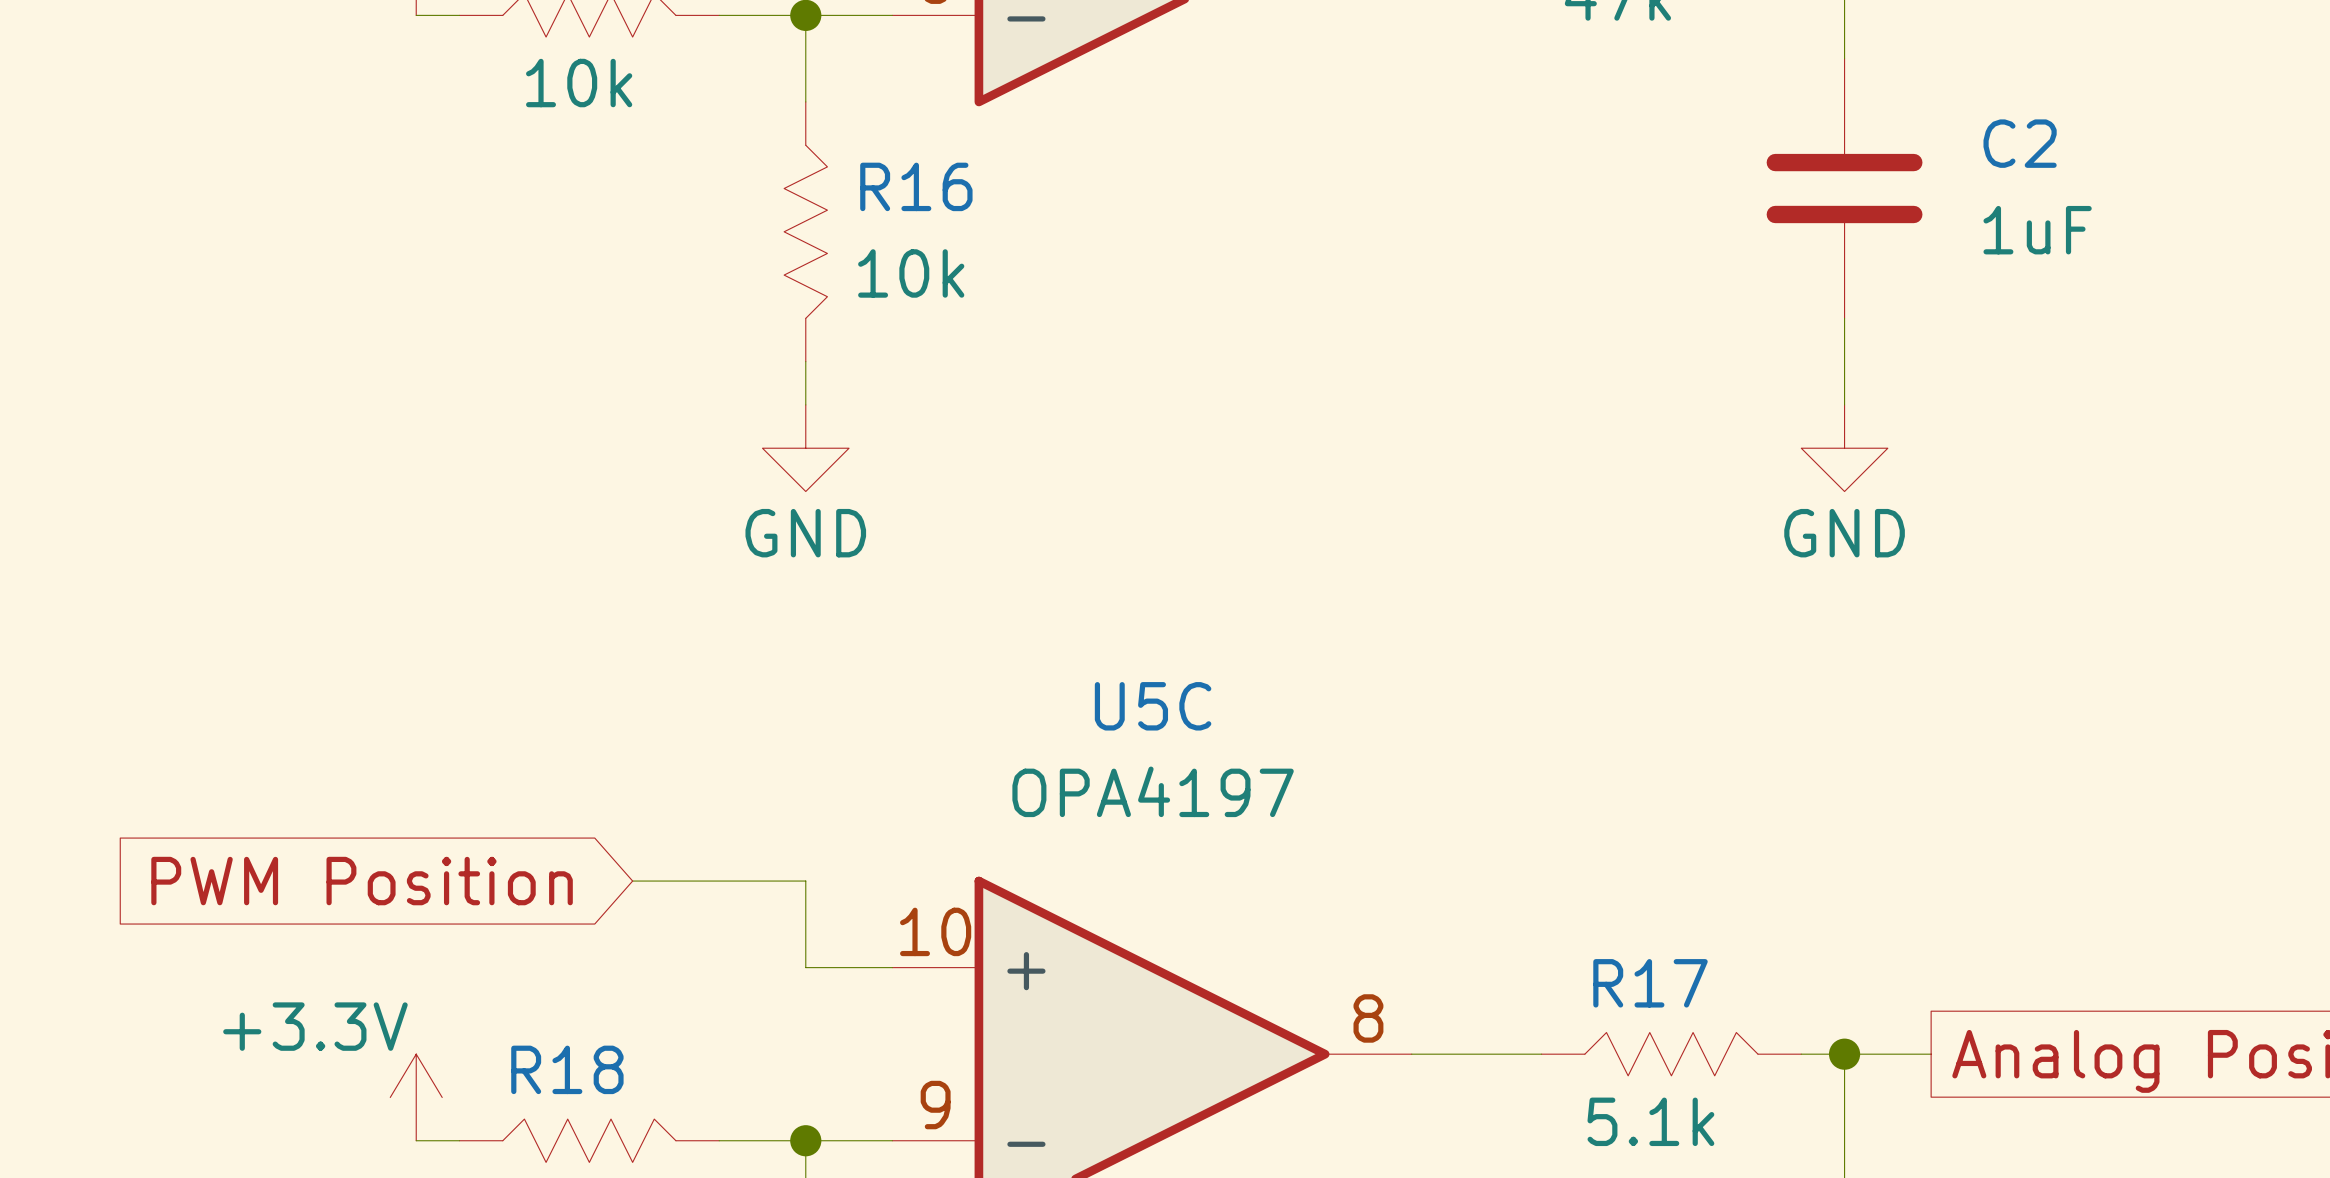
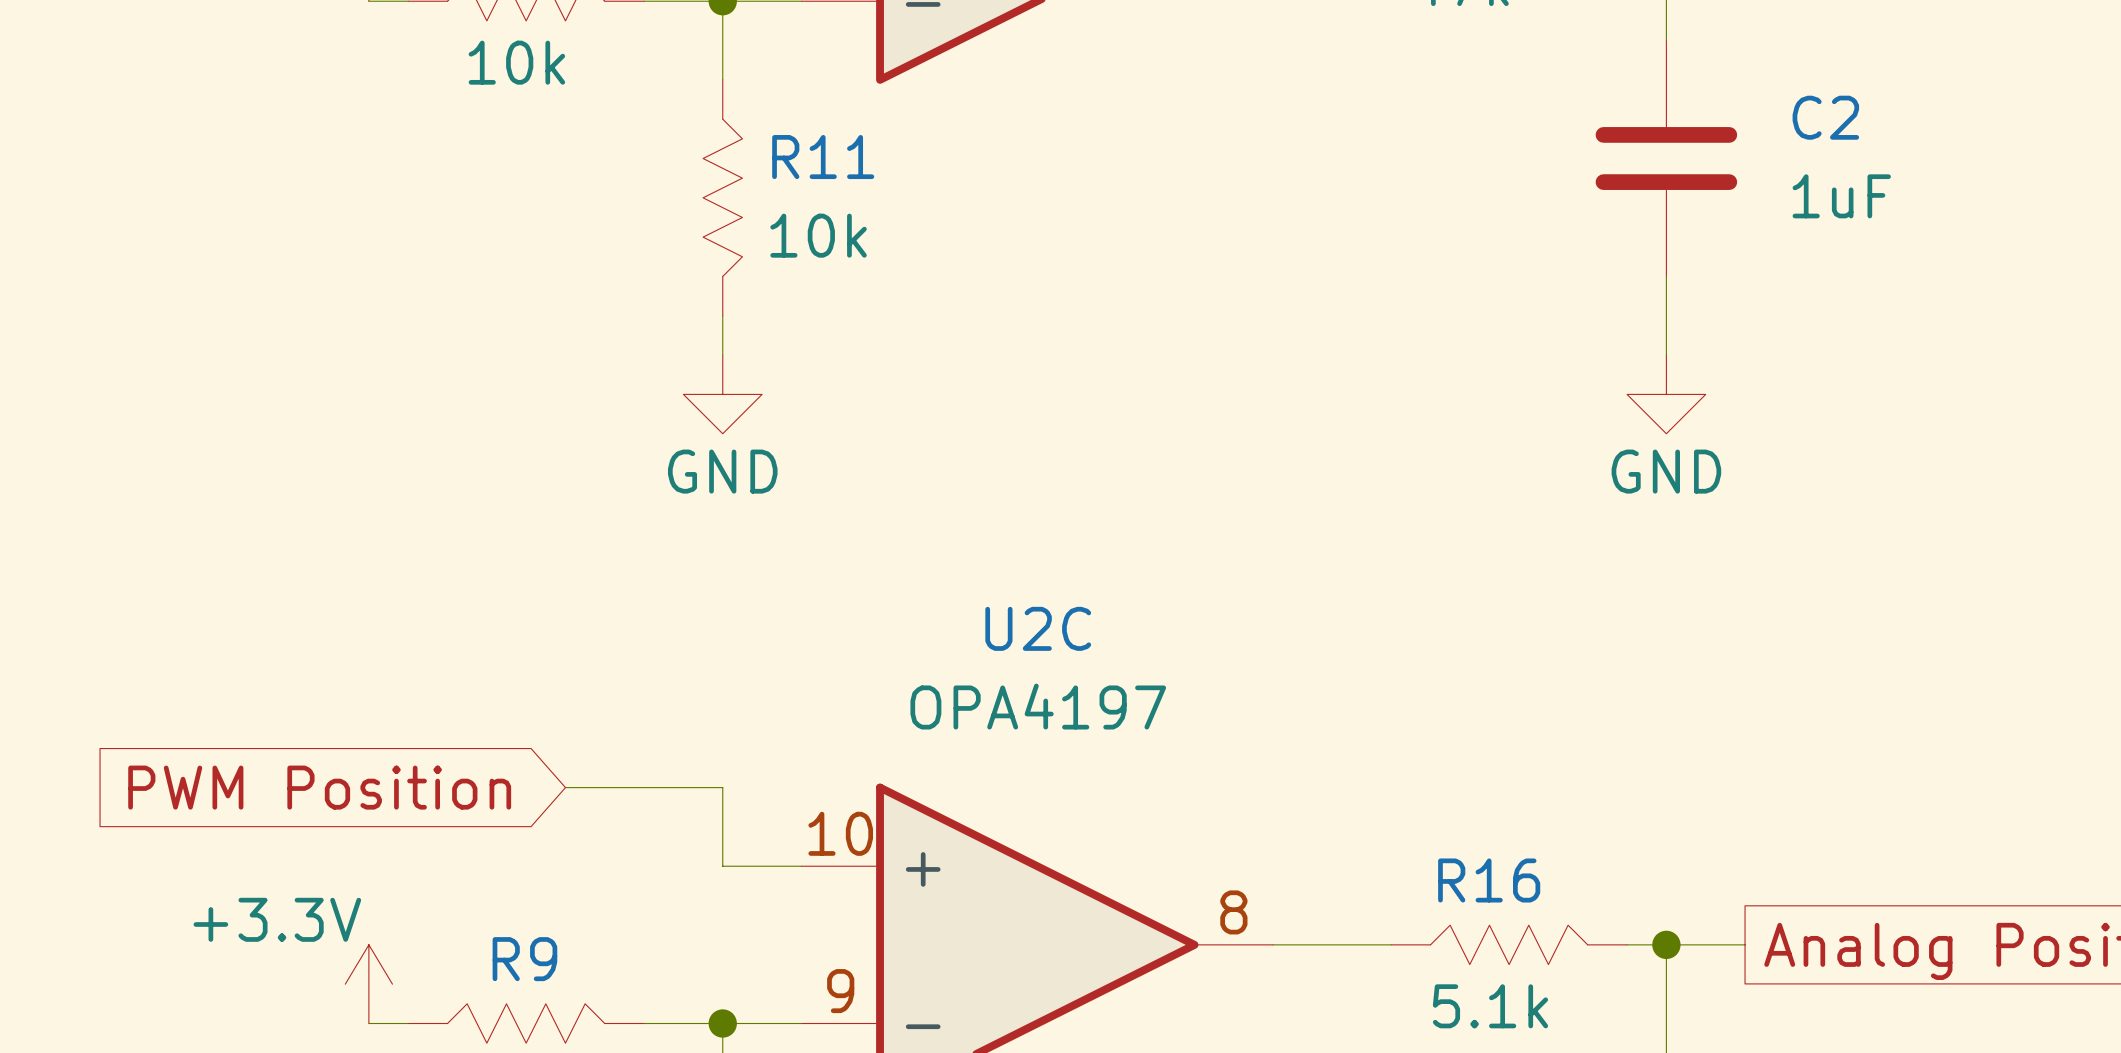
R16 name: R16 (916, 186) -> R11 (823, 157)
U5C name: U5C (1153, 706) -> U2C (1038, 628)
R17 name: R17 (1650, 983) -> R16 (1489, 880)
R18 name: R18 (567, 1069) -> R9 (524, 959)

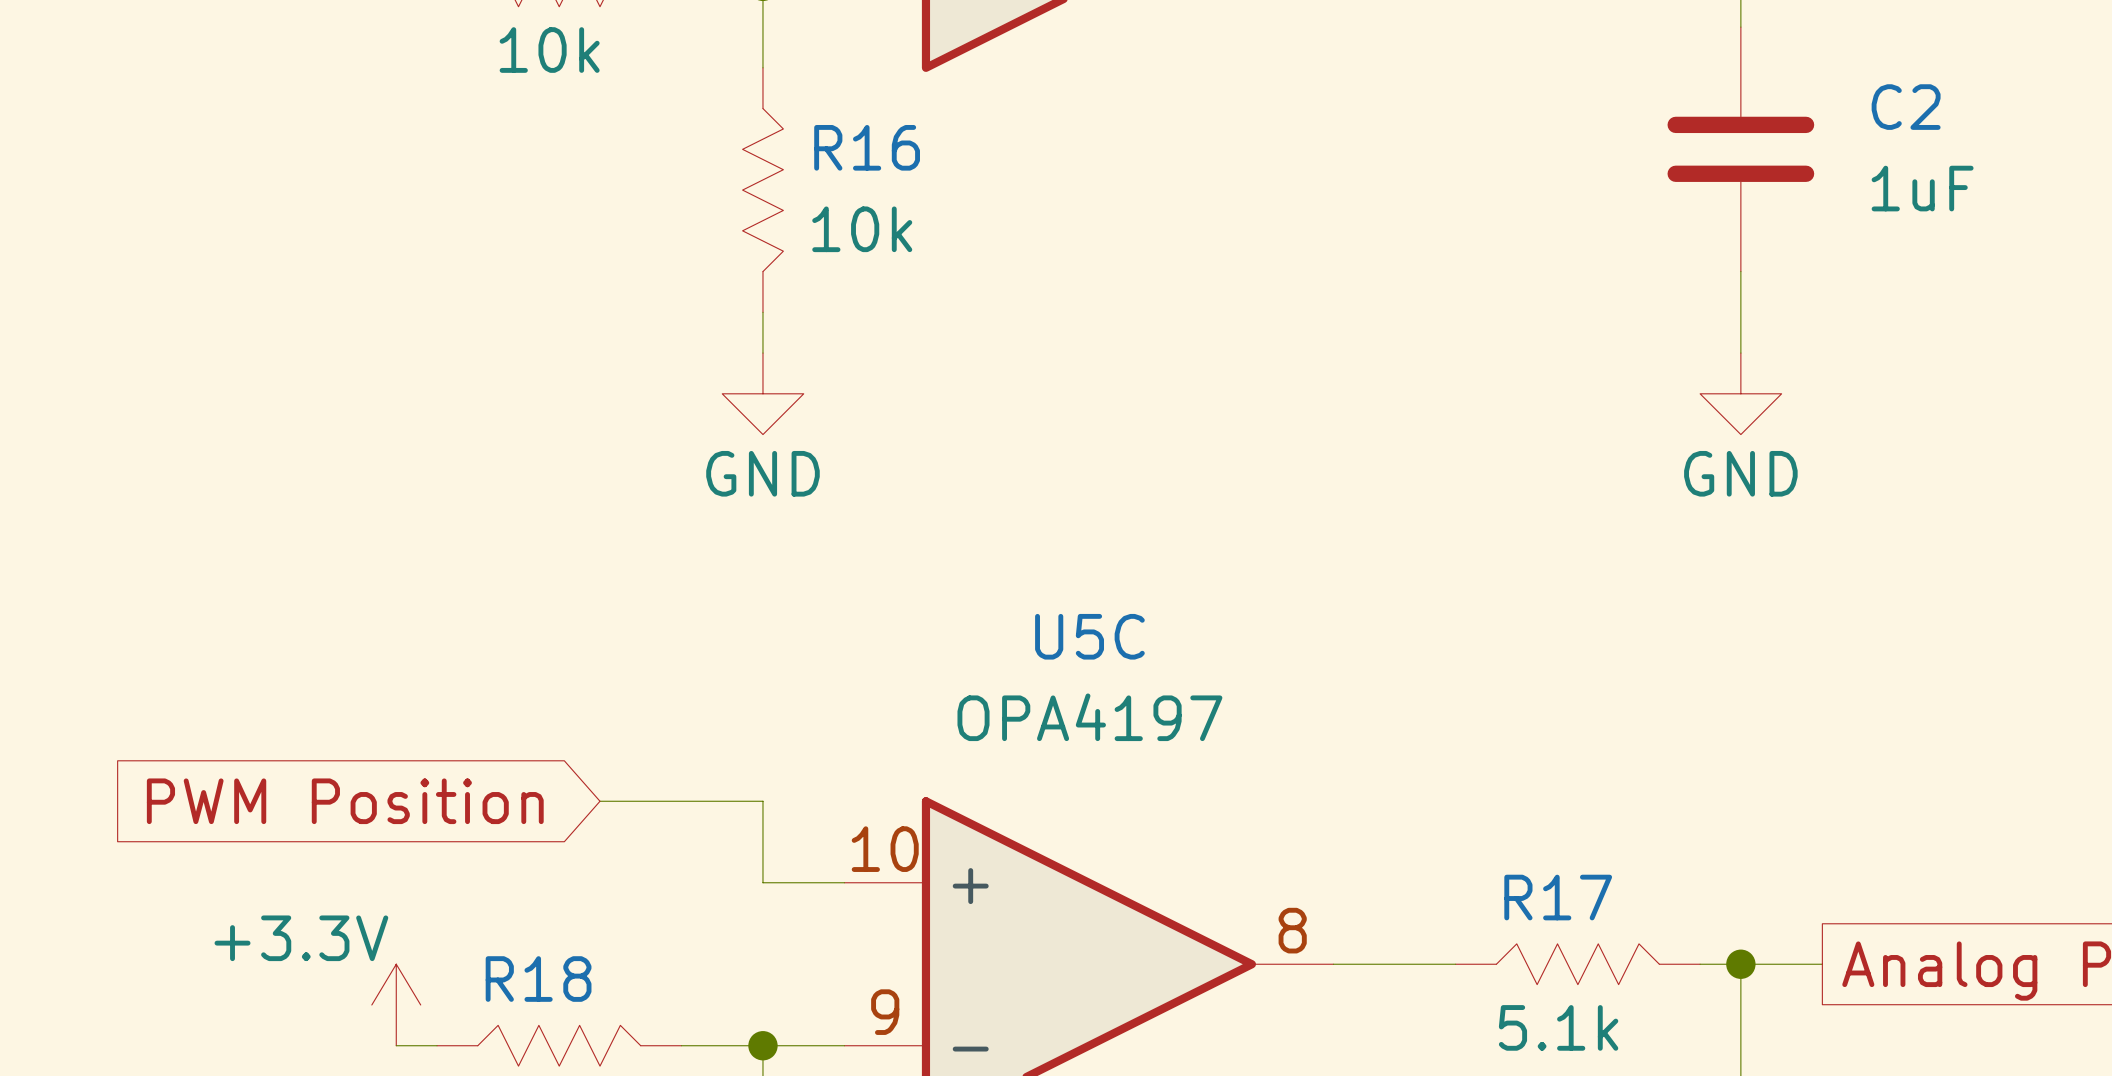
R11 name: R11 (823, 157) -> R16 (867, 147)
U2C name: U2C (1038, 628) -> U5C (1089, 636)
R16 name: R16 (1489, 880) -> R17 (1558, 897)
R9 name: R9 (524, 959) -> R18 (538, 979)

